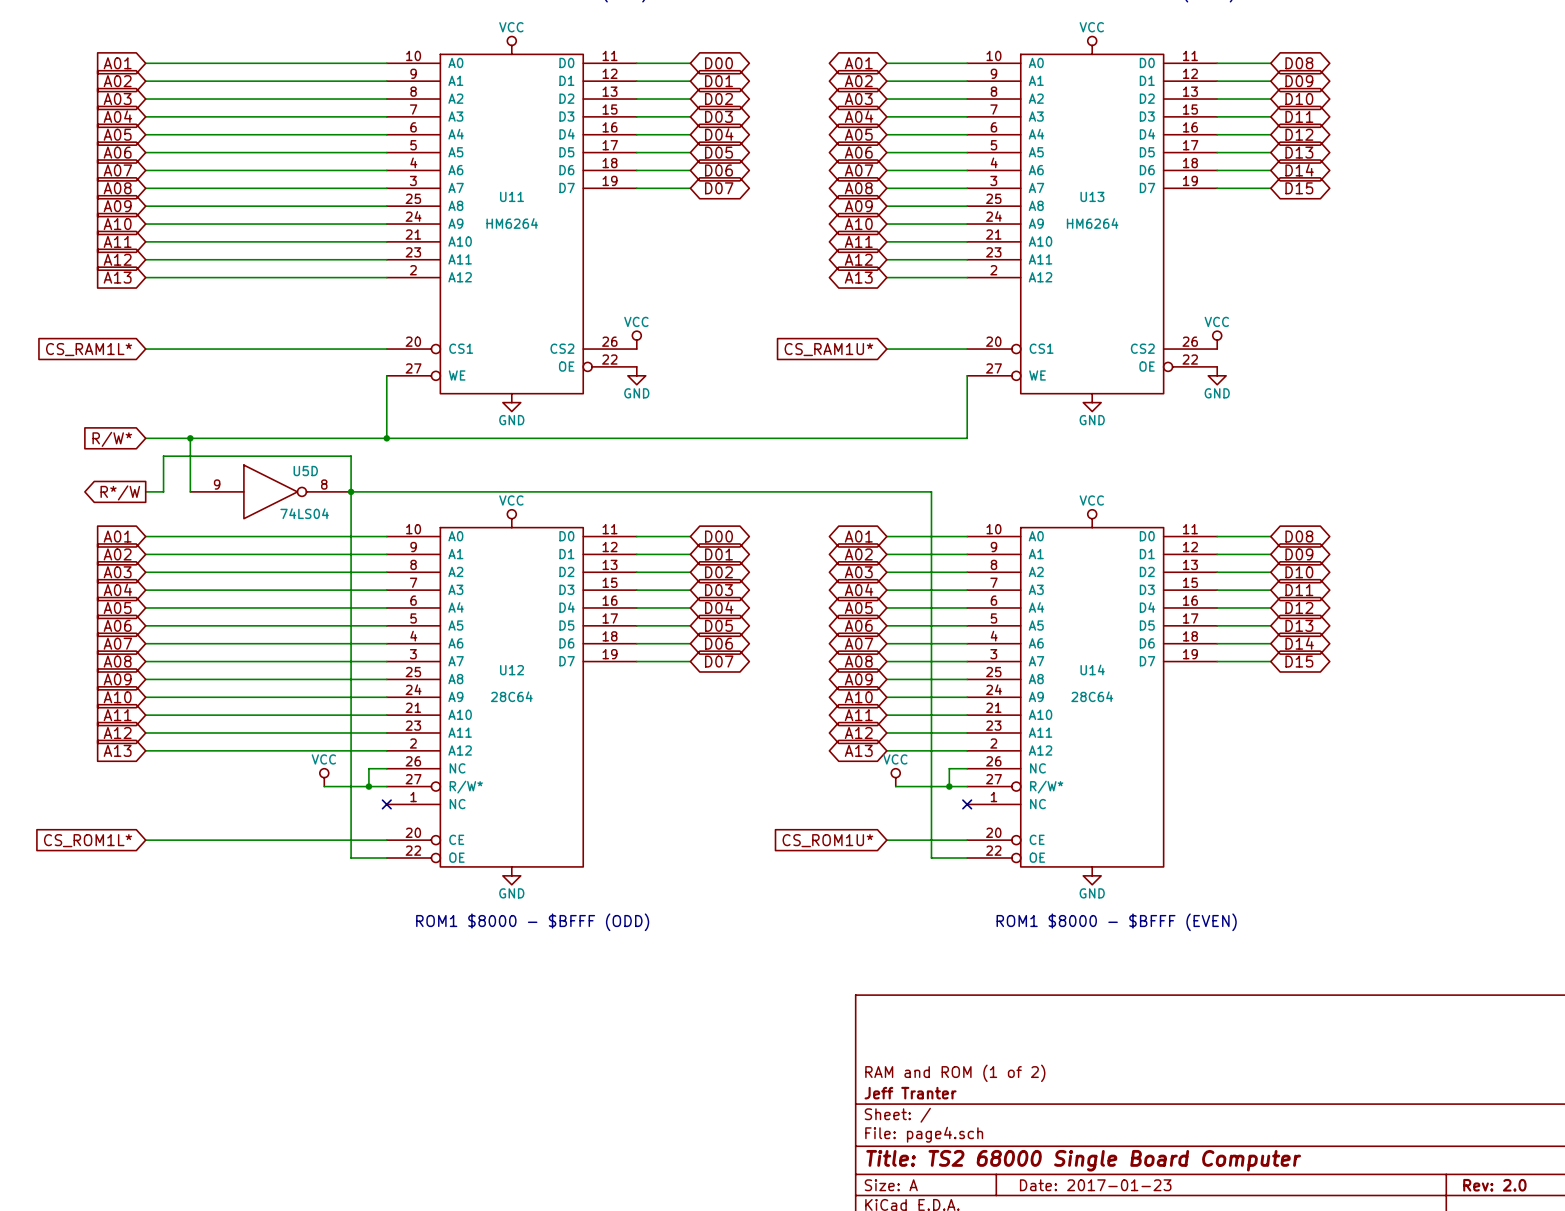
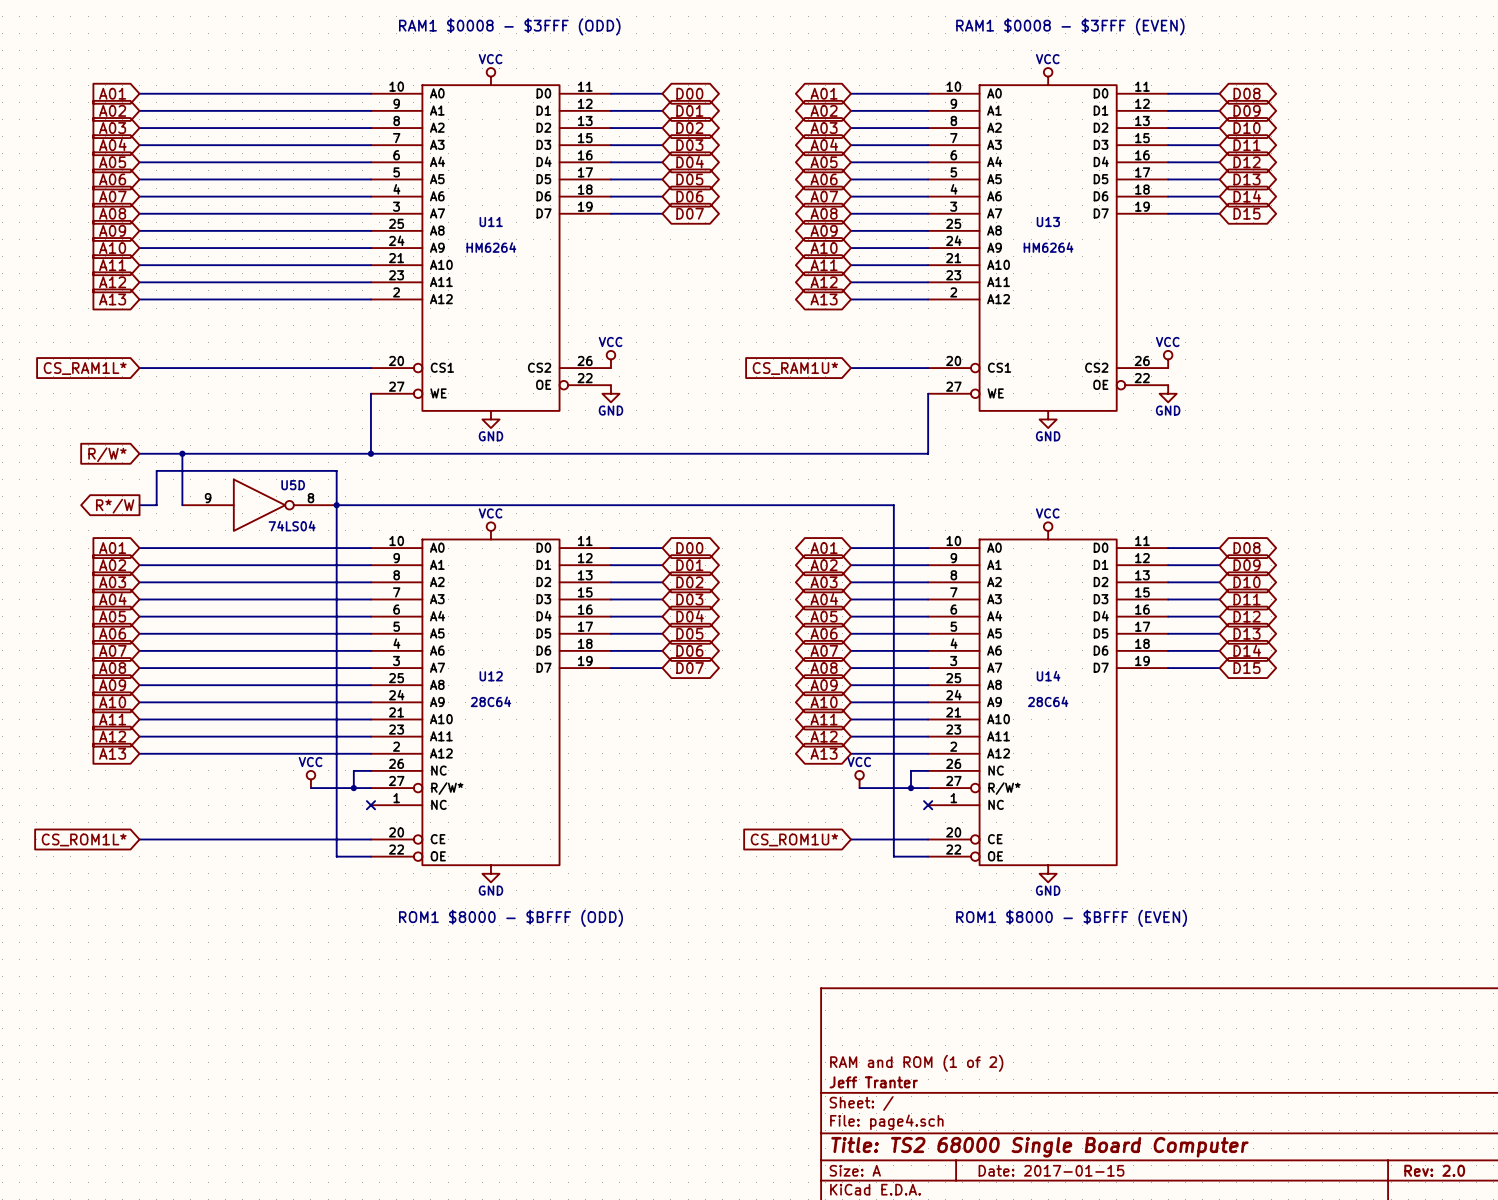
title block: Date: 2017-01-23 (1095, 1185) -> Date: 2017-01-15 (1051, 1170)

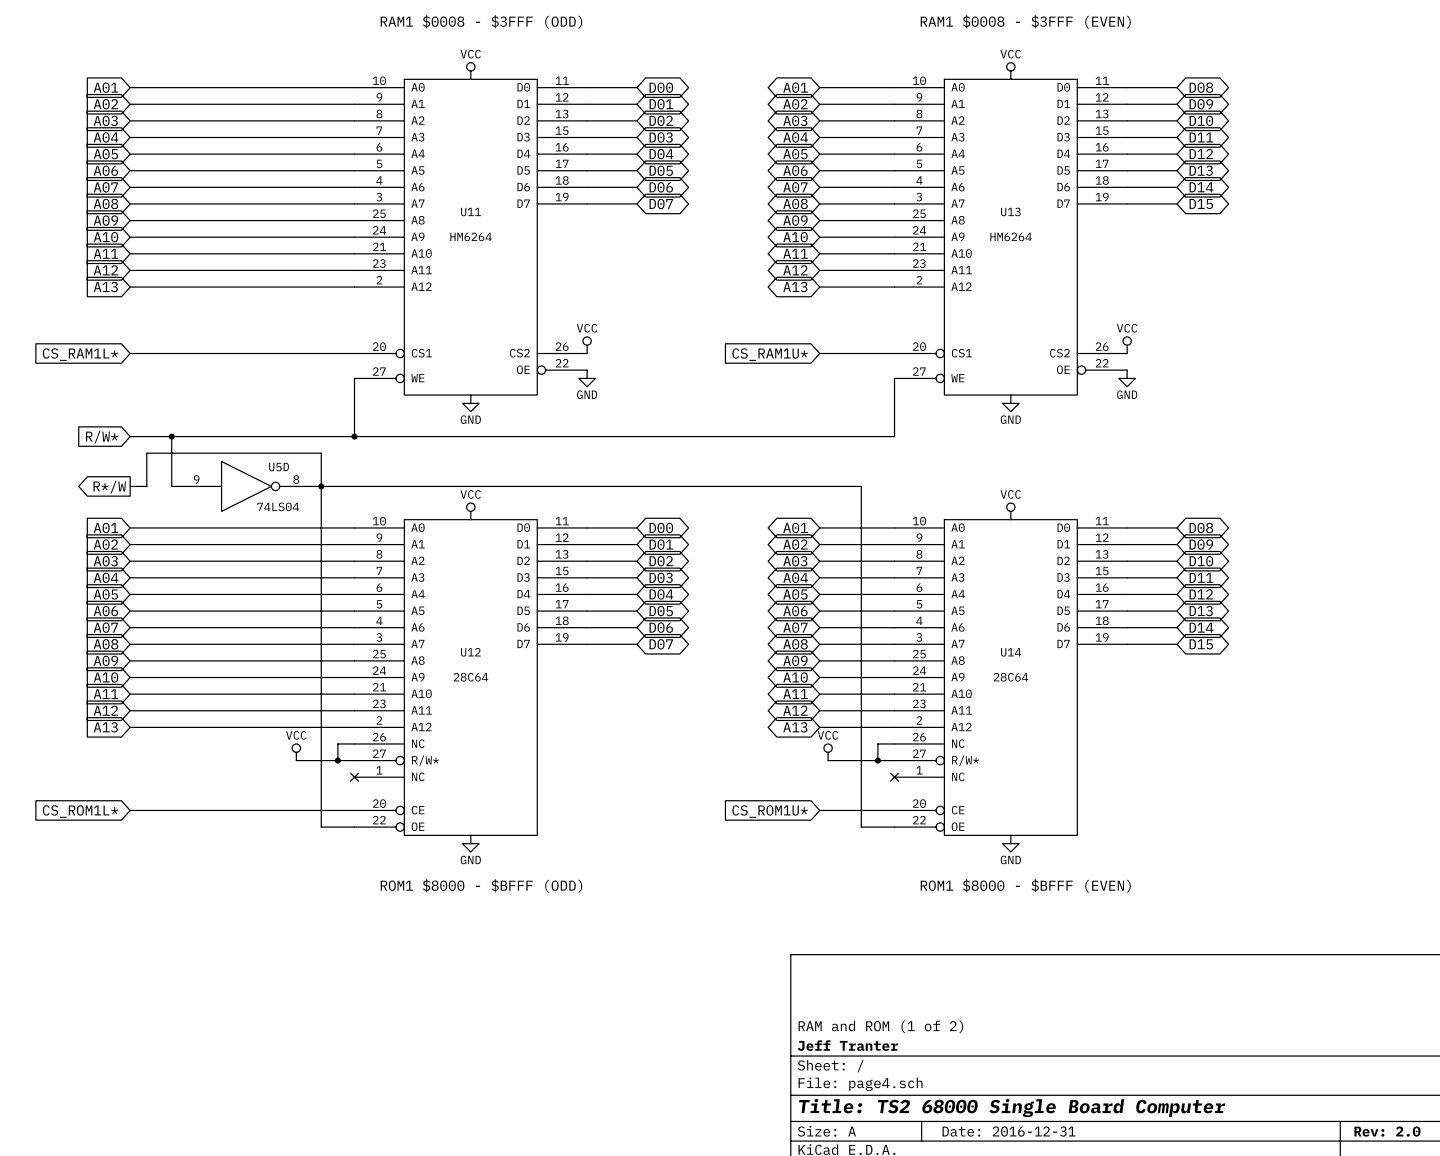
title block: Date: 2017-01-15 (1051, 1170) -> Date: 2016-12-31 (1009, 1131)

